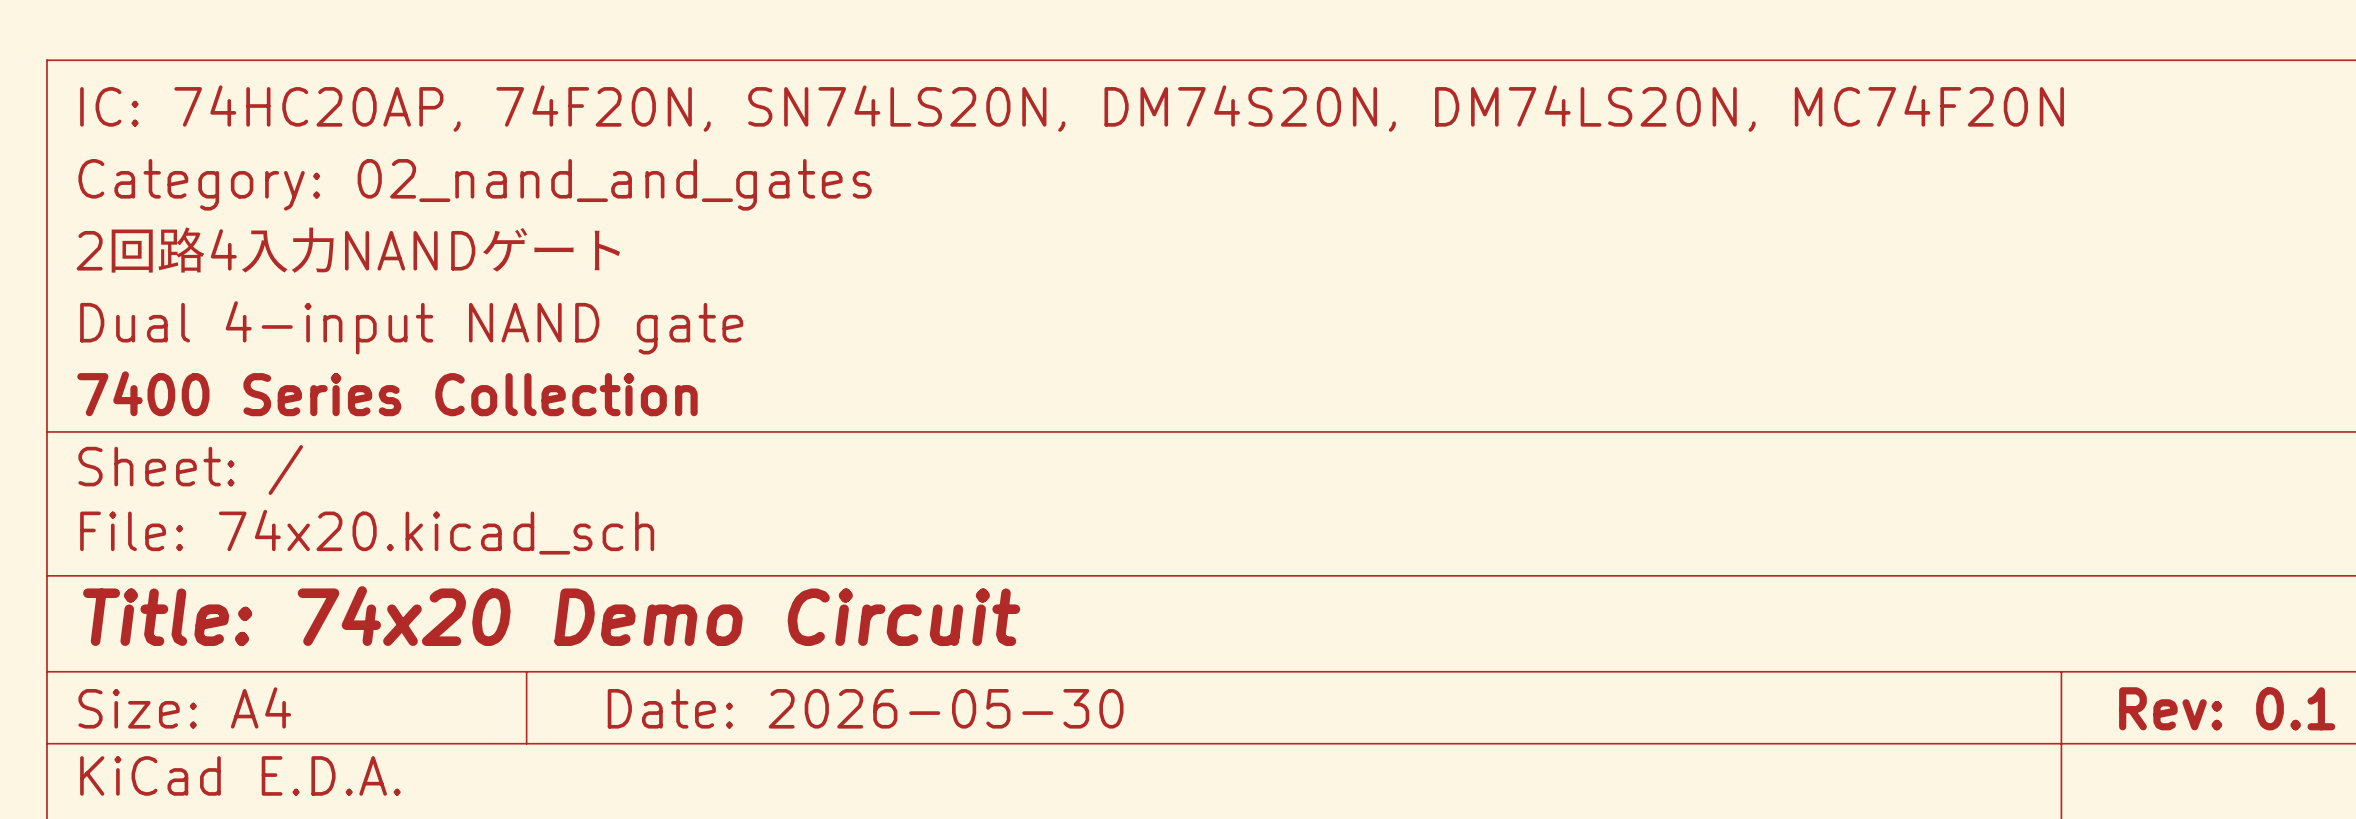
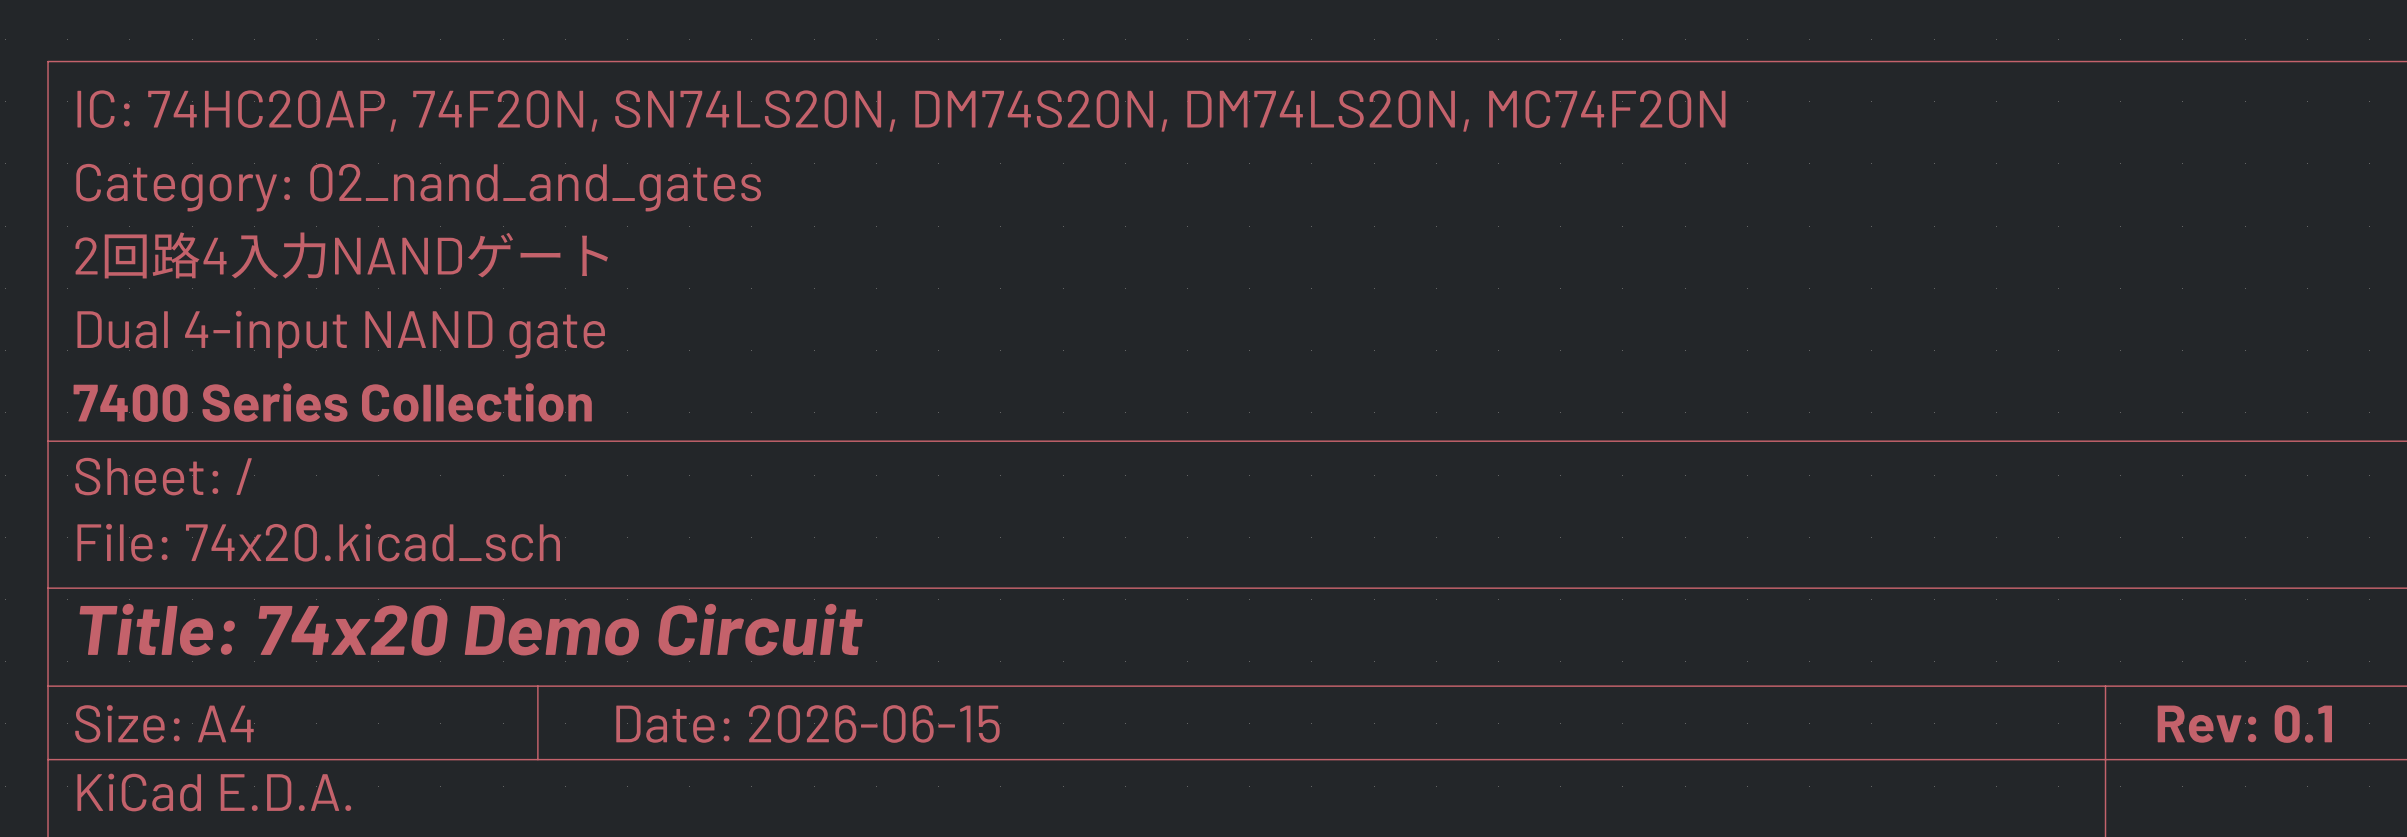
title block: Date: 2026-05-30 (865, 708) -> Date: 2026-06-15 (808, 723)

